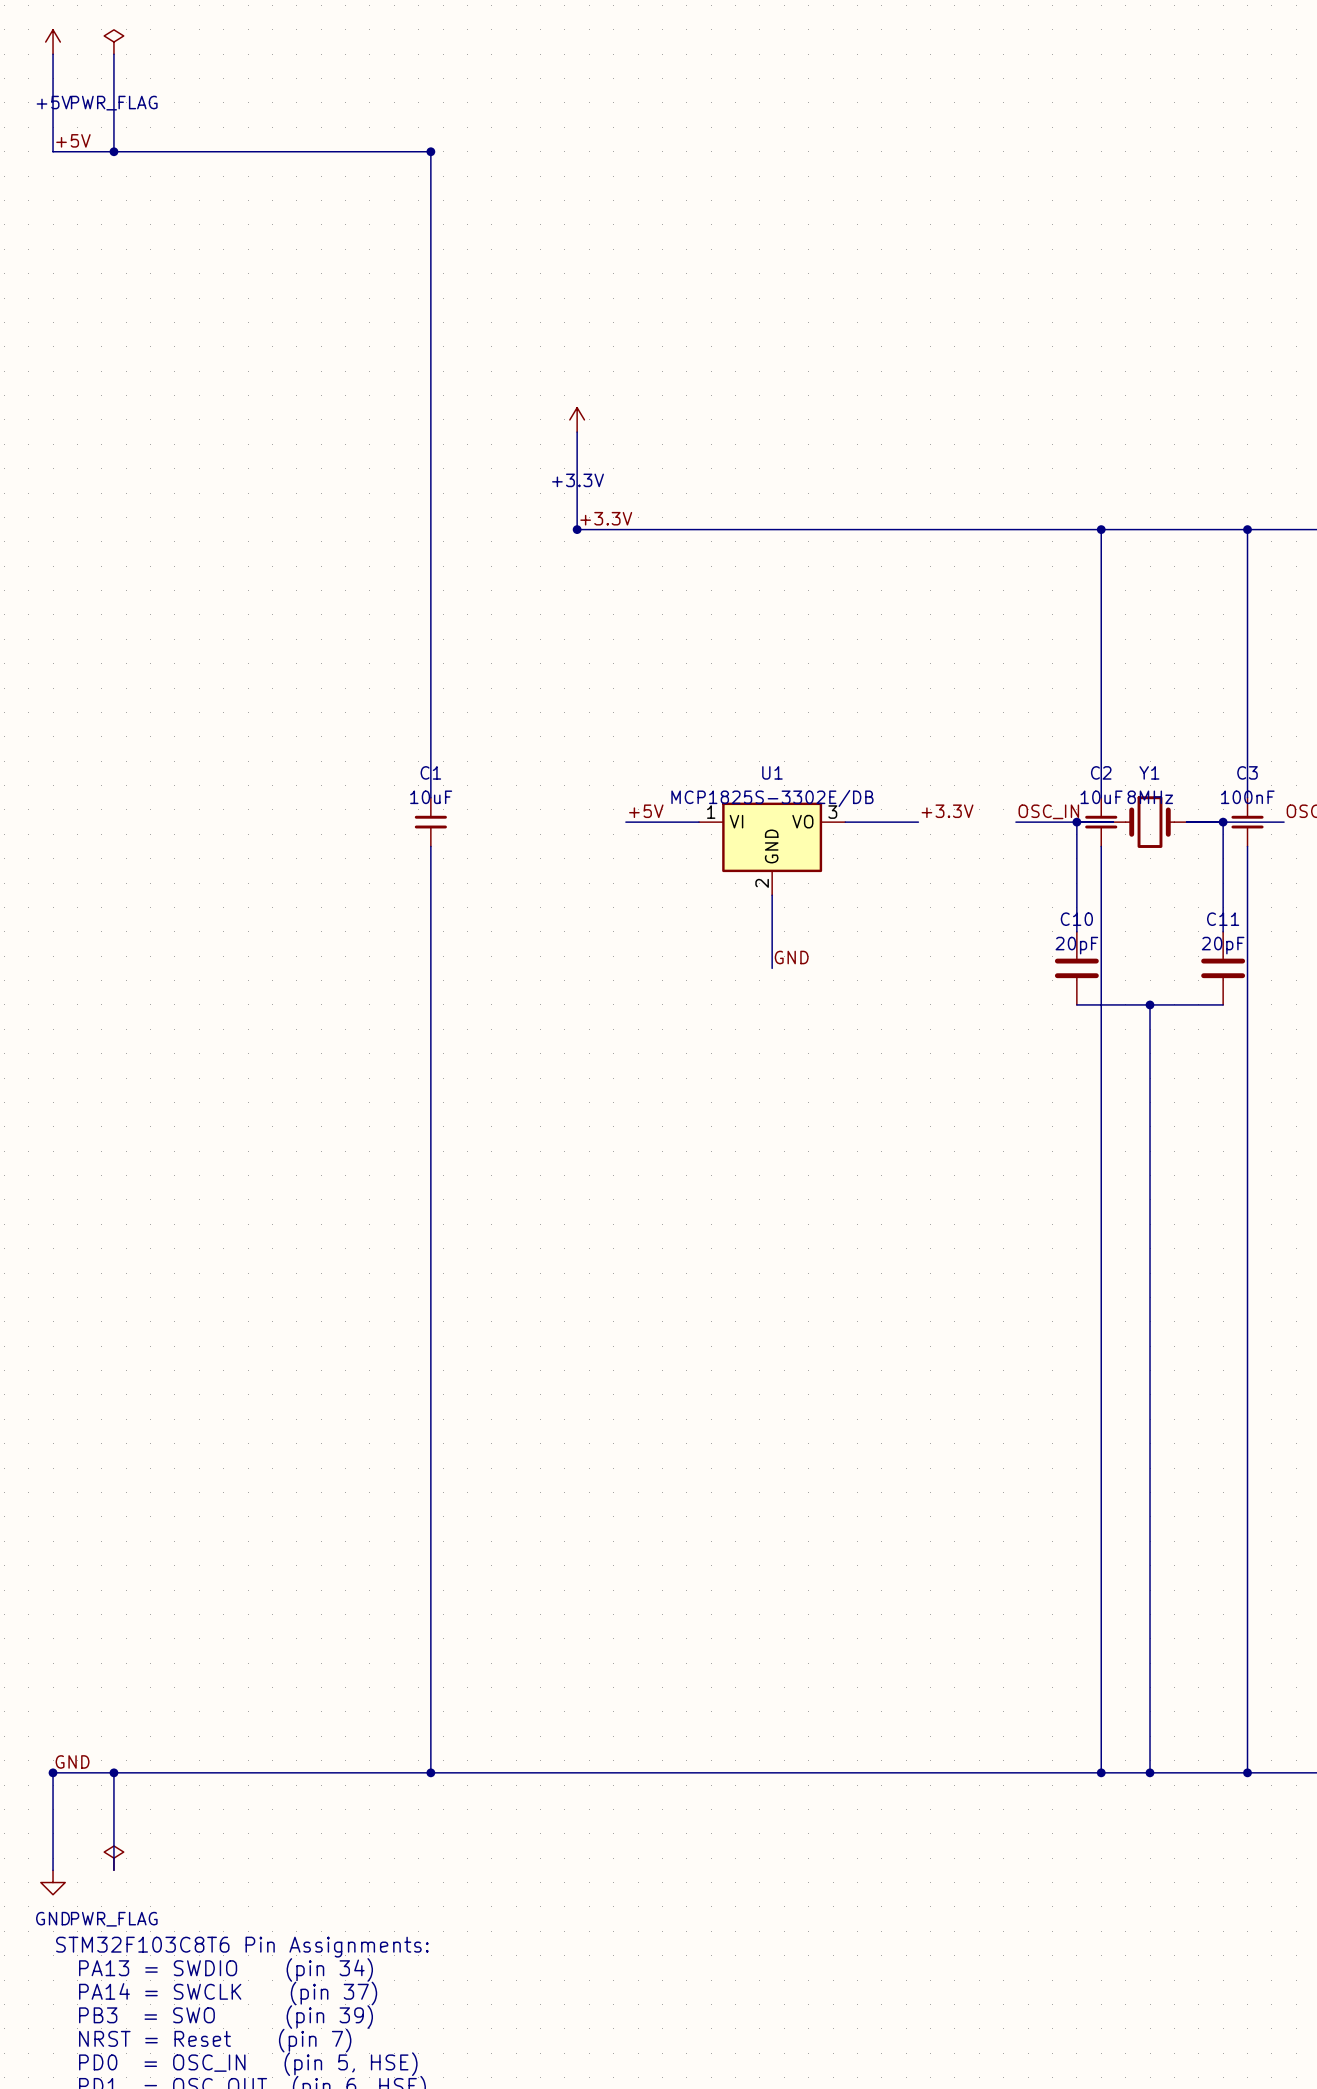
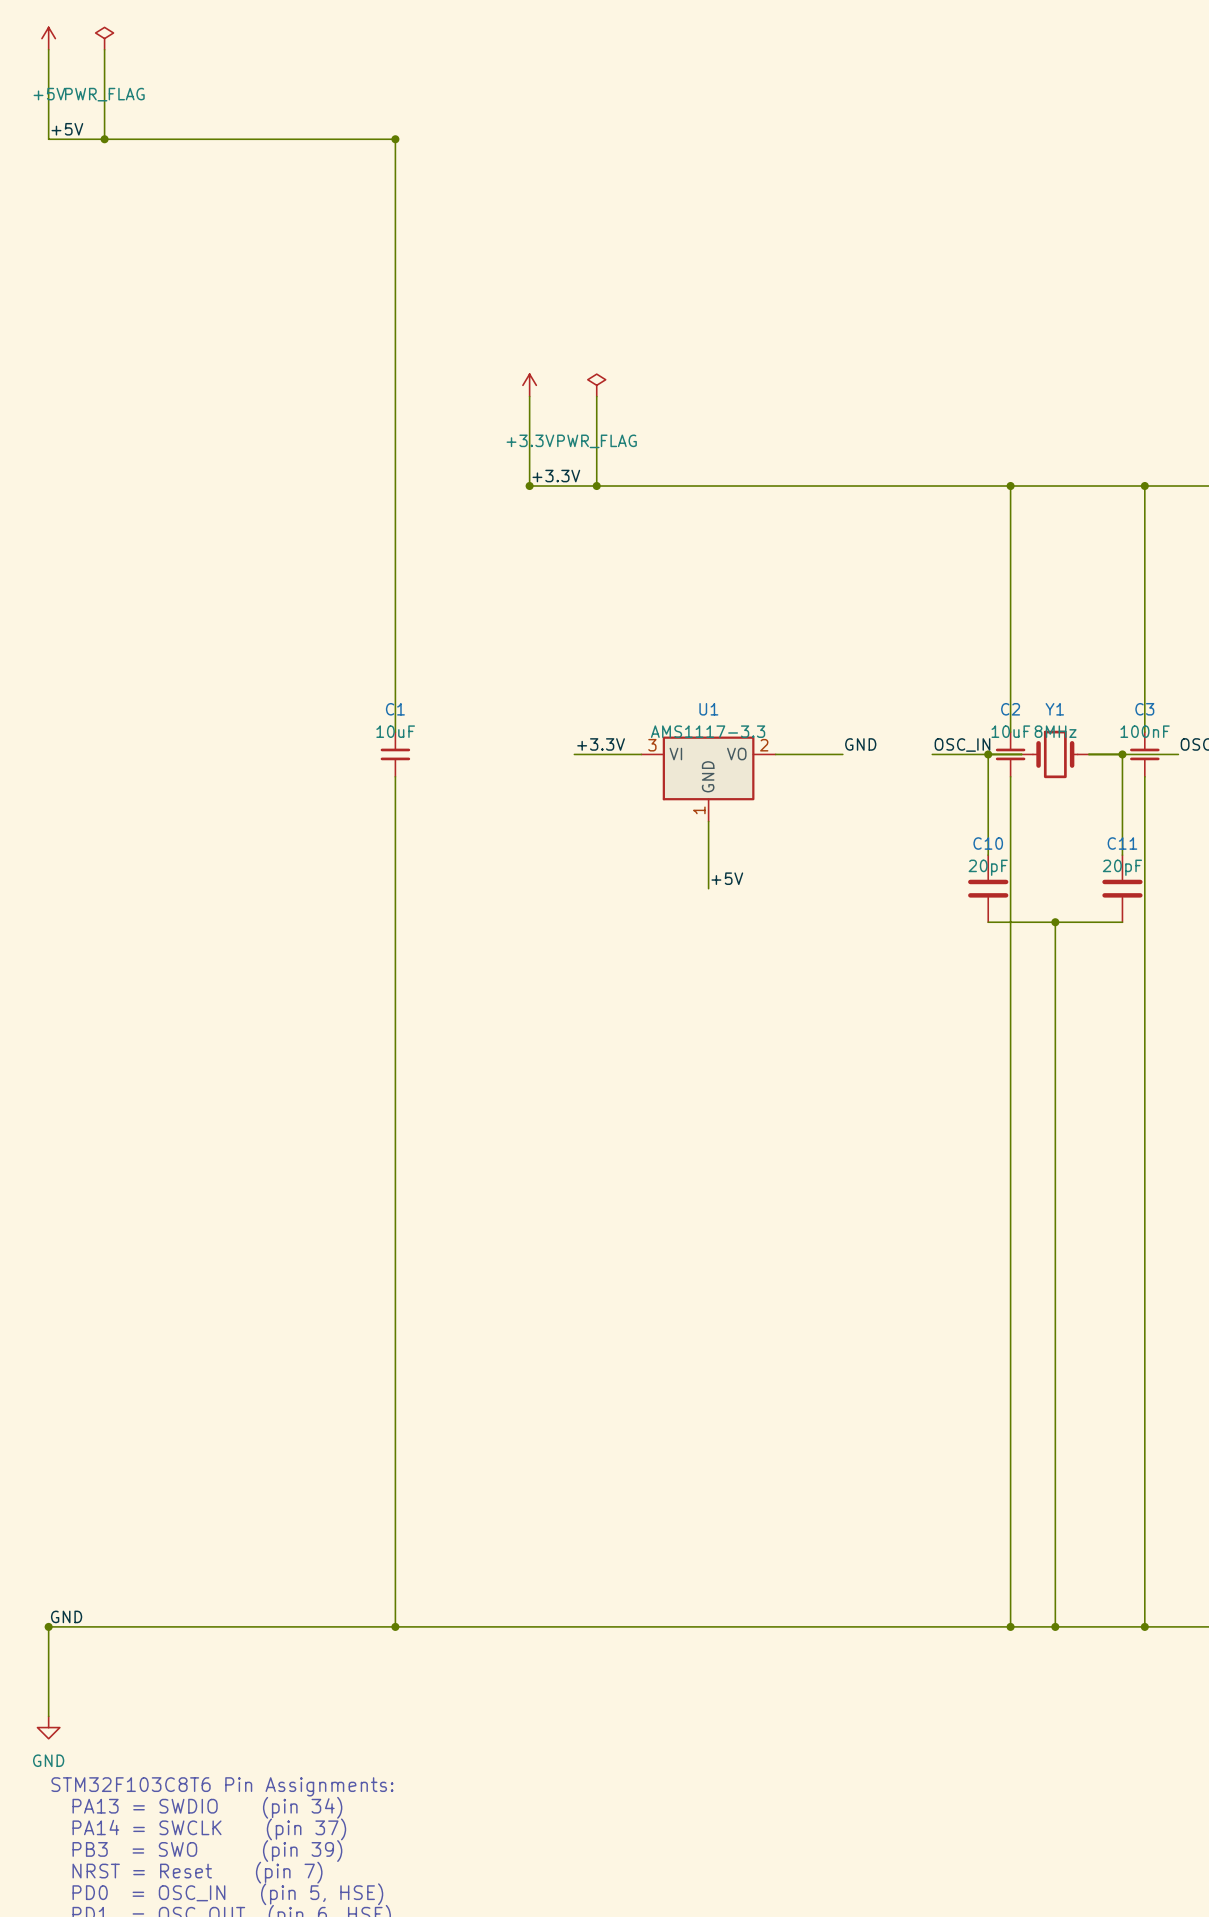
power symbol: none -> PWR_FLAG (596, 385)
wire: none -> (596, 396) (596, 486)
junction: none -> (596, 486)
U1 value: MCP1825S-3302E/DB (772, 798) -> AMS1117-3.3 (708, 731)
label: +5V (646, 811) -> +3.3V (601, 744)
label: +3.3V (947, 811) -> GND (860, 744)
U1 pin number: 1 (711, 812) -> 3 (652, 745)
U1 pin number: 3 (832, 812) -> 2 (764, 745)
U1 pin number: 2 (762, 883) -> 1 (699, 810)
label: GND (791, 957) -> +5V (727, 878)
wire: (113, 1772) (113, 1870) -> none
junction: (113, 1772) -> none
power symbol: PWR_FLAG (113, 1858) -> none

